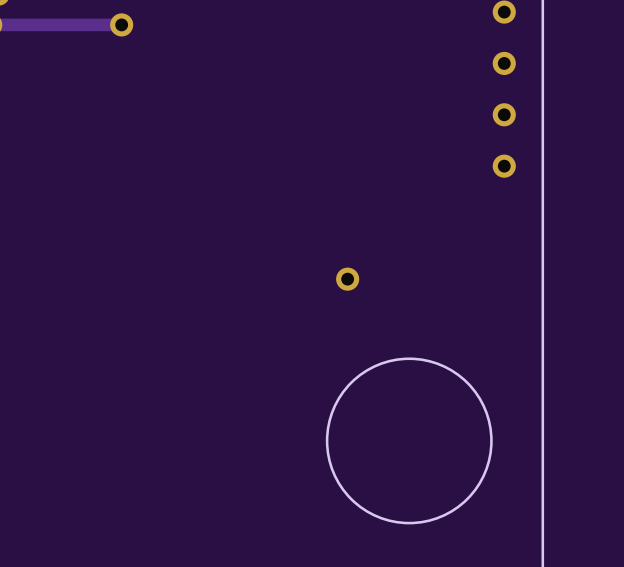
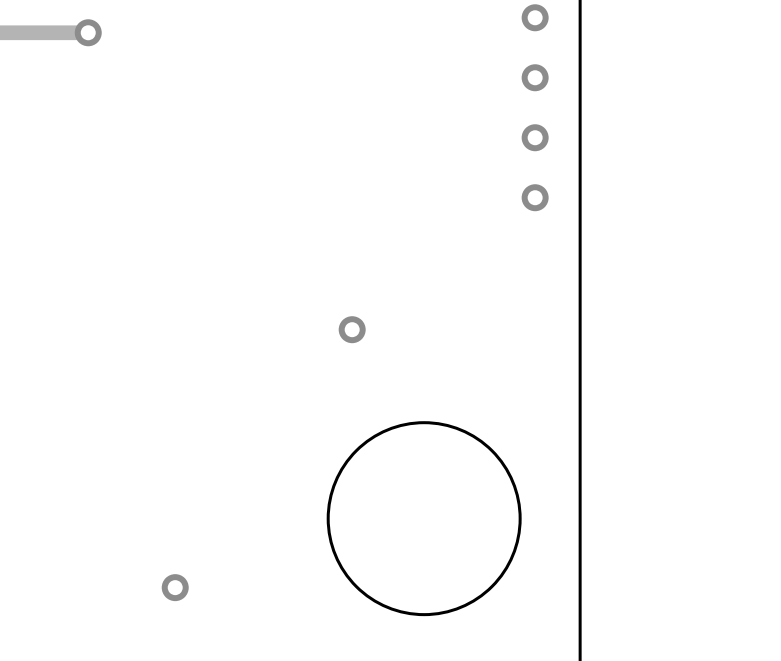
via: none -> (175, 587)

